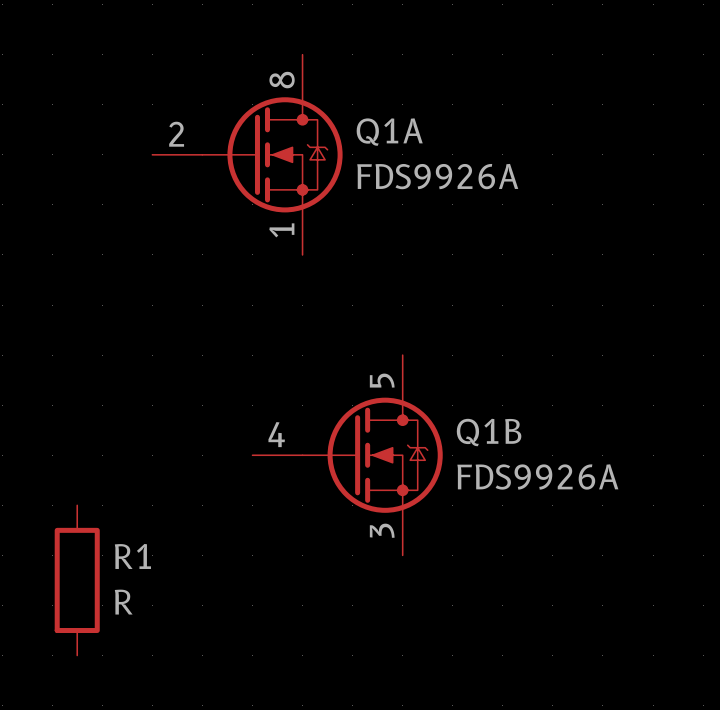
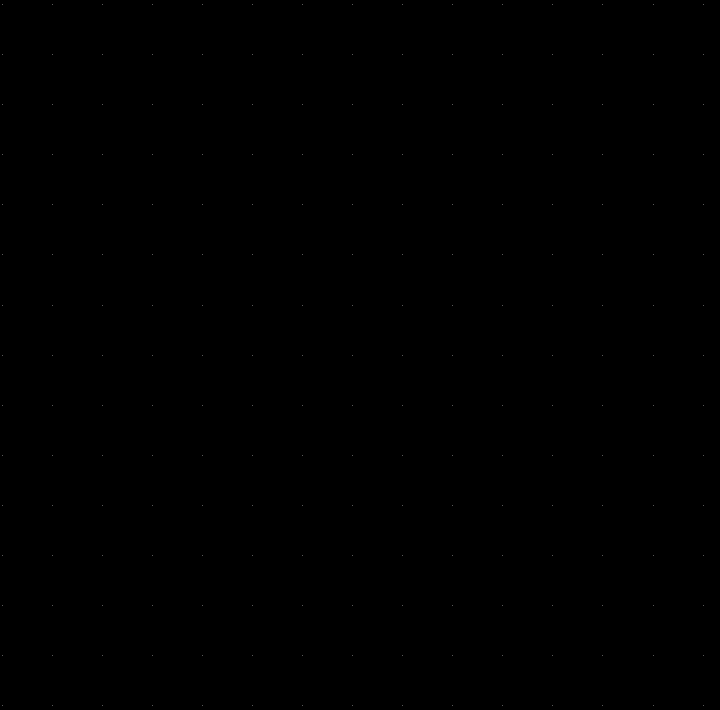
Q1A: FDS9926A (247, 154) -> none
Q1B: FDS9926A (347, 455) -> none
R1: R (77, 580) -> none

